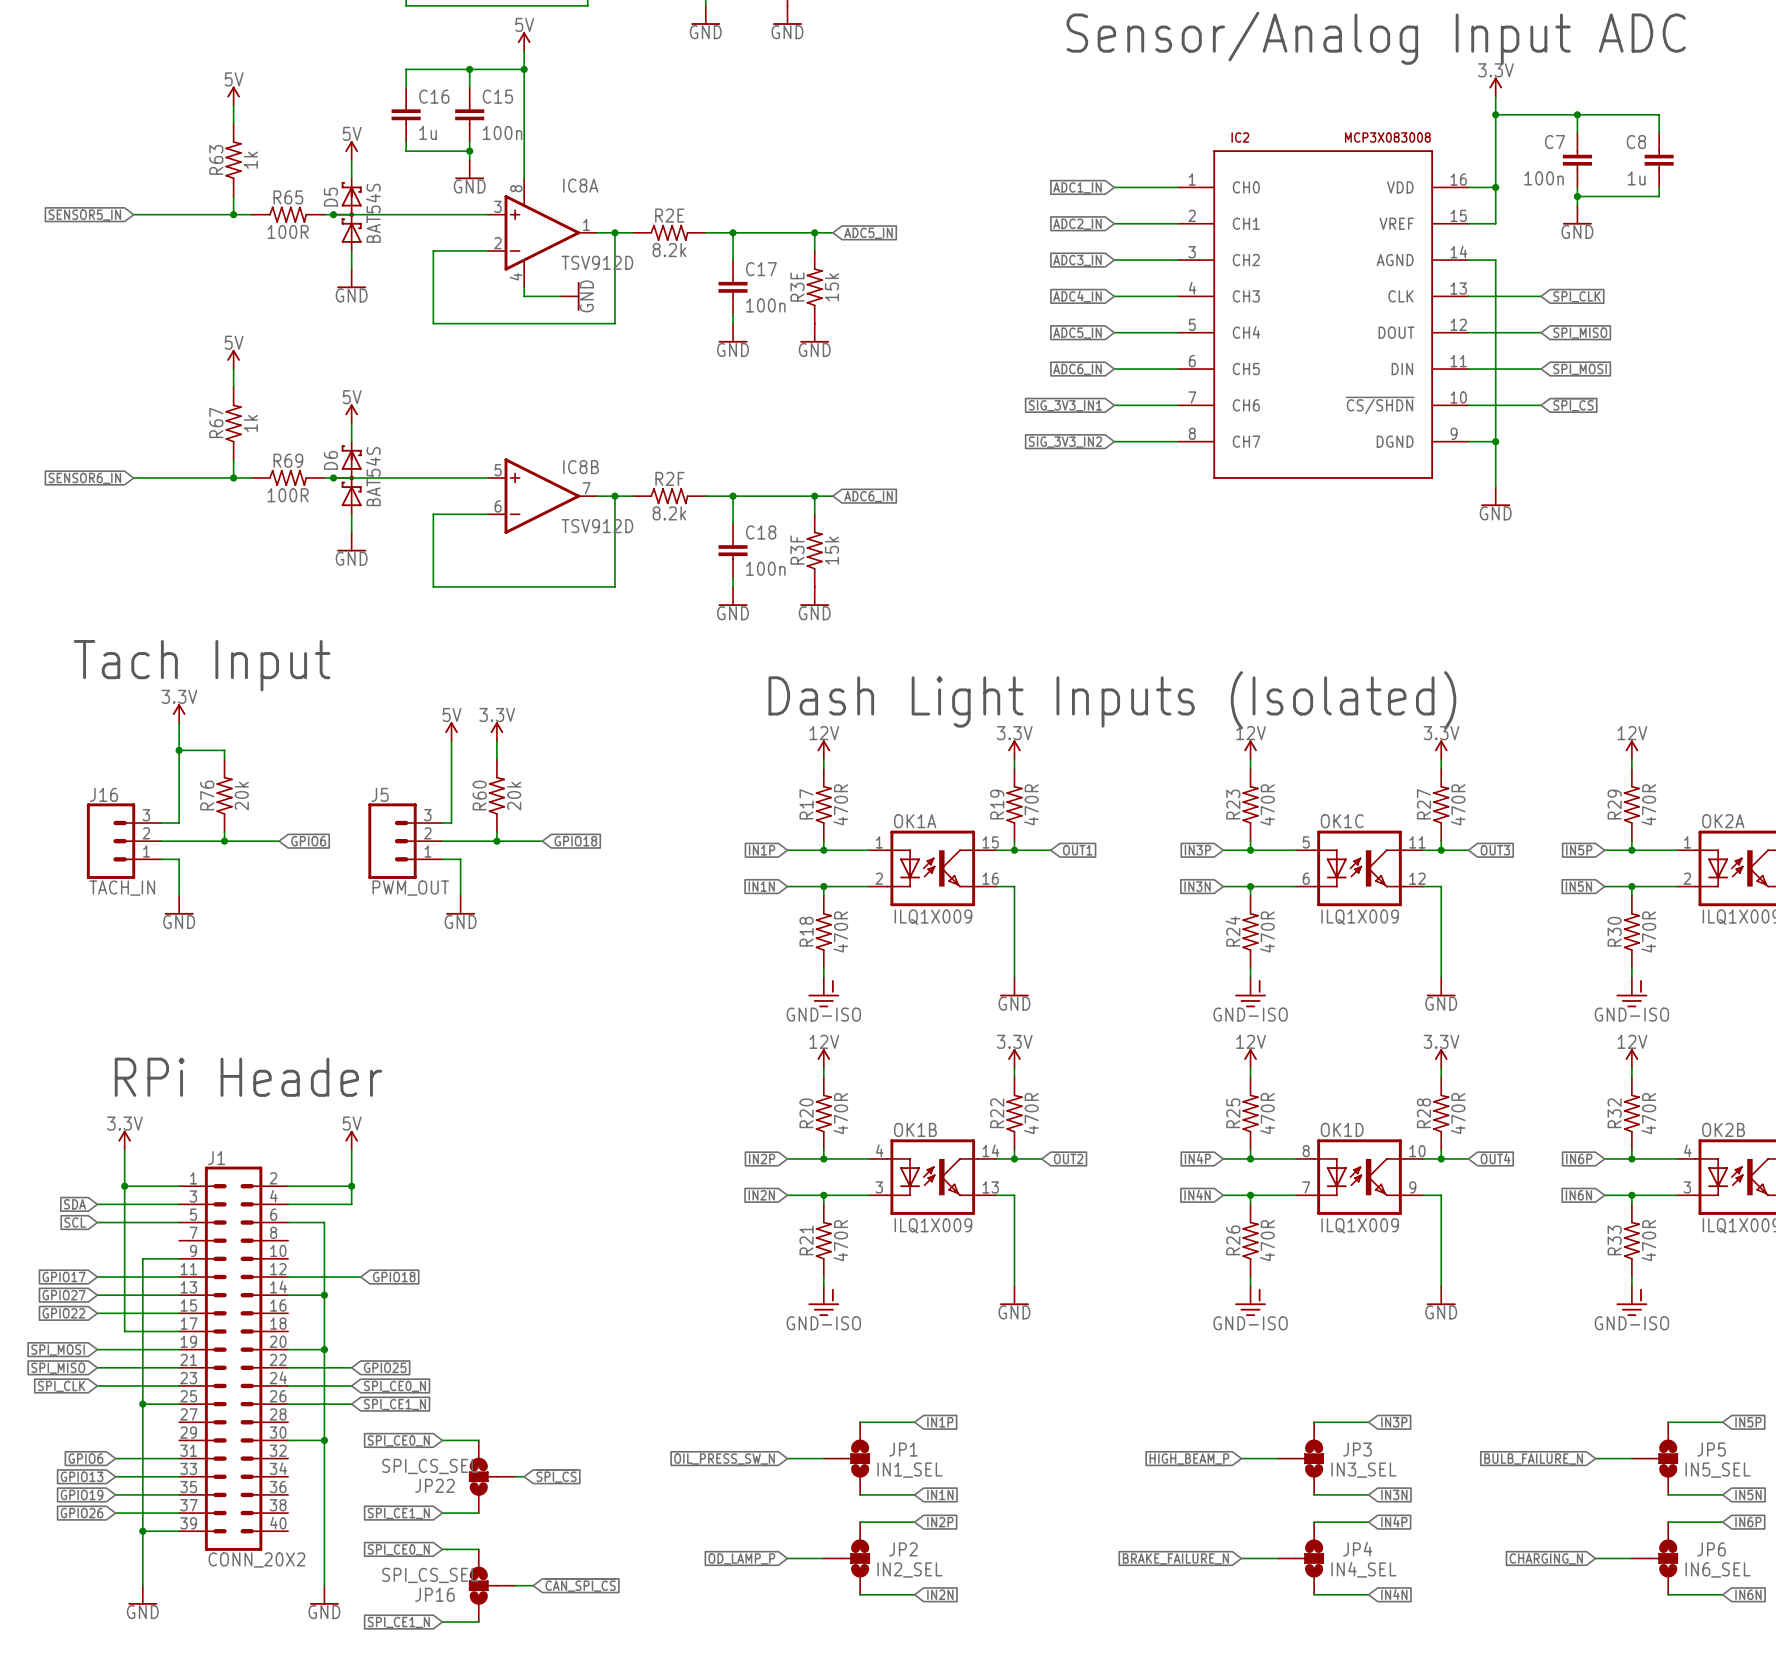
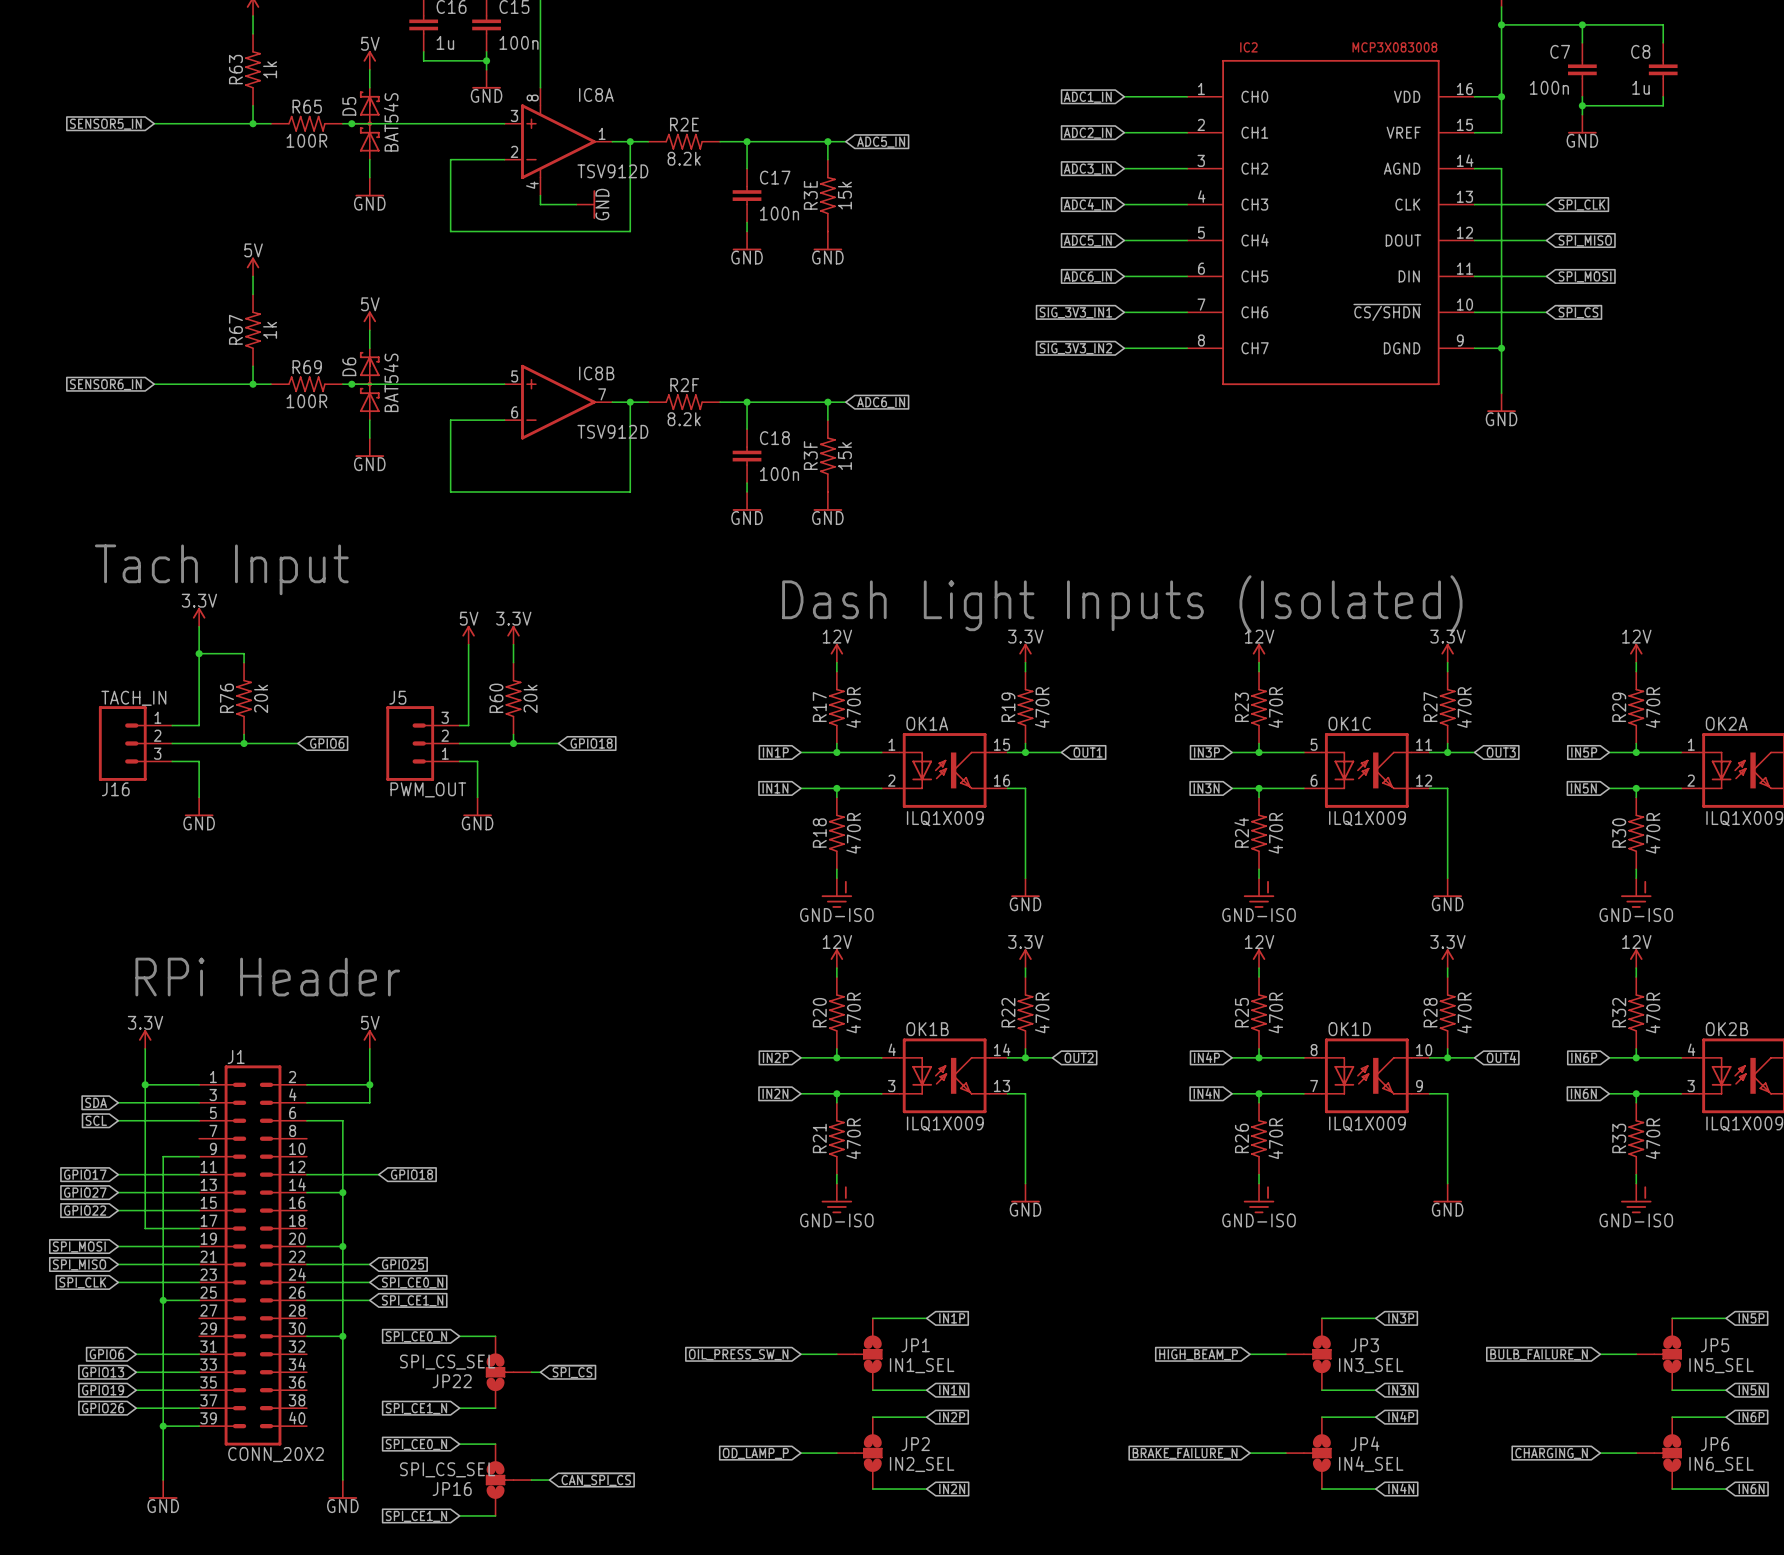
J16 flip: as is (111, 841) -> up-down (122, 743)

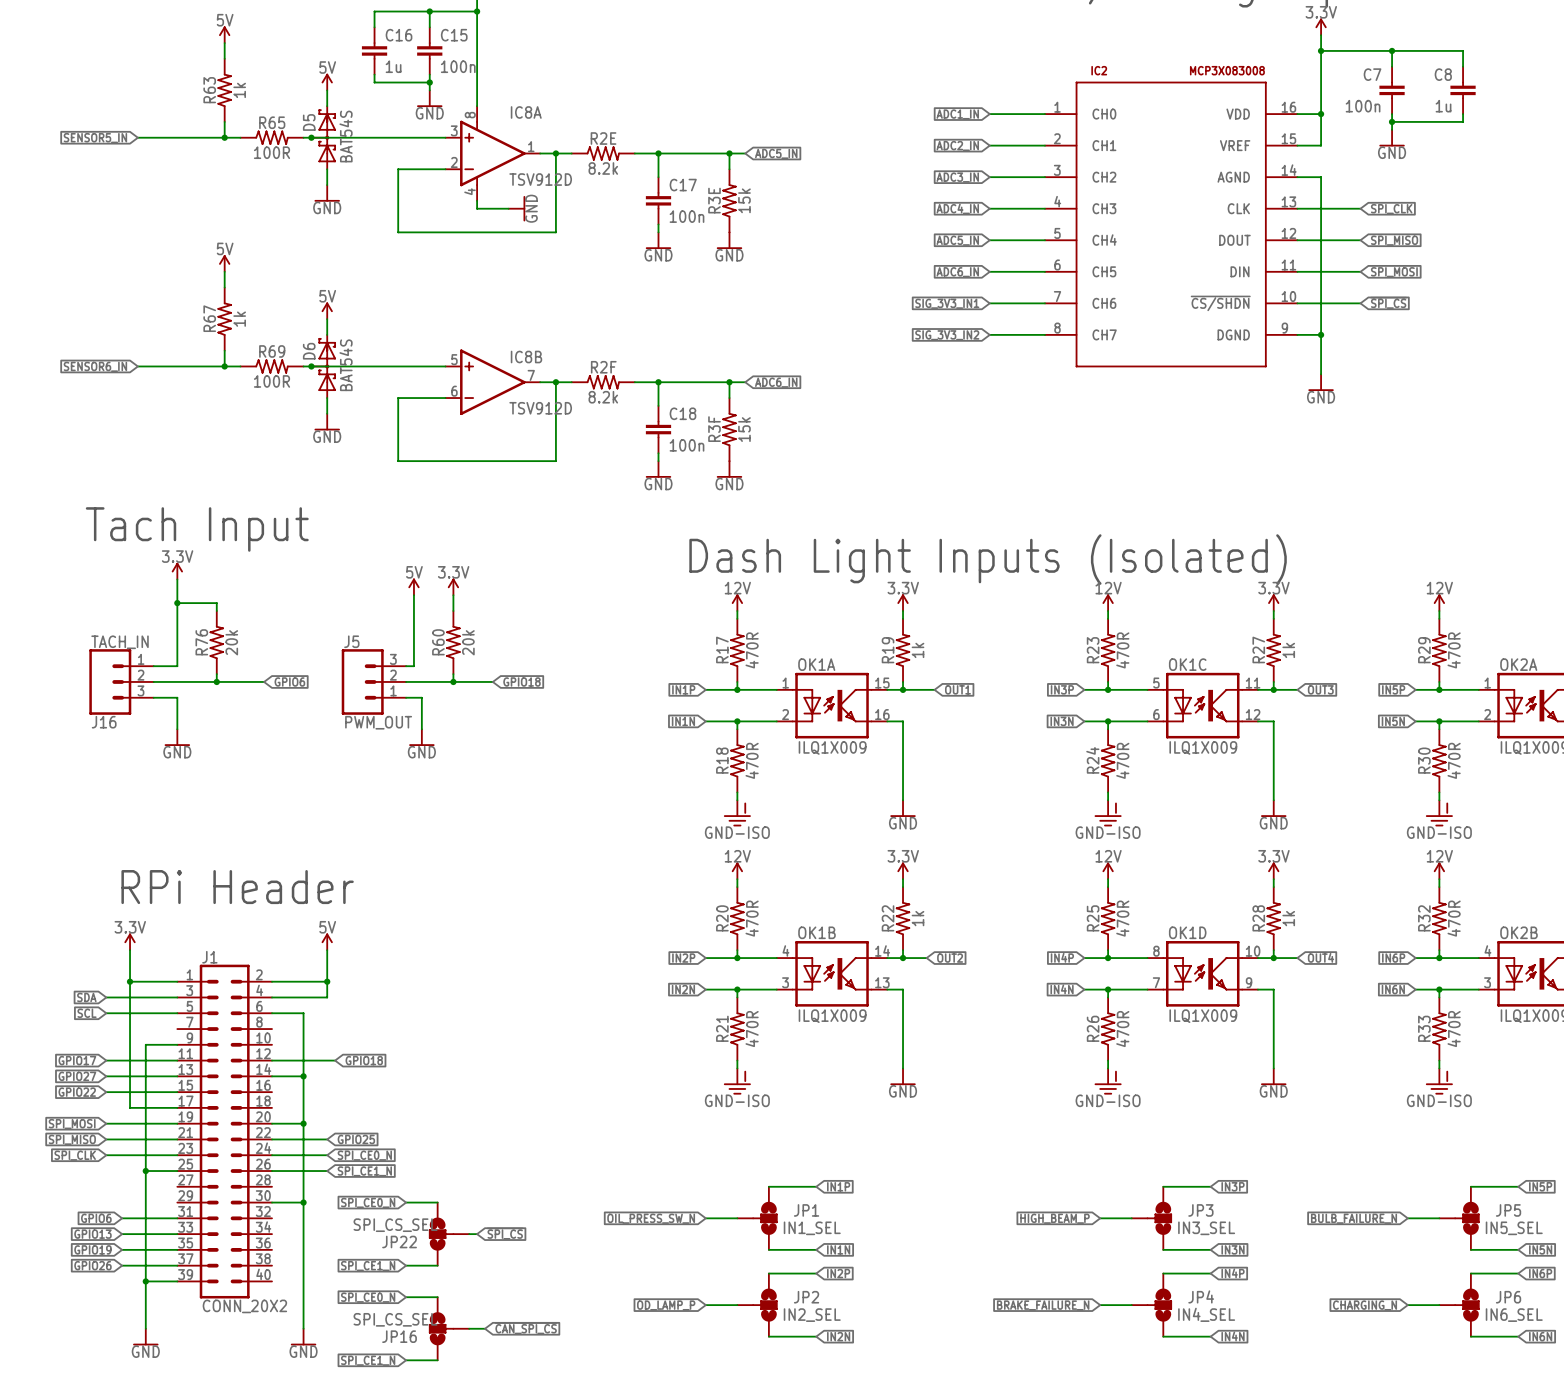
R19 value: 470R (1042, 707) -> 1k (918, 650)
R27 value: 470R (1464, 707) -> 1k (1288, 650)
R22 value: 470R (1042, 1012) -> 1k (918, 918)
R28 value: 470R (1464, 1012) -> 1k (1288, 918)

